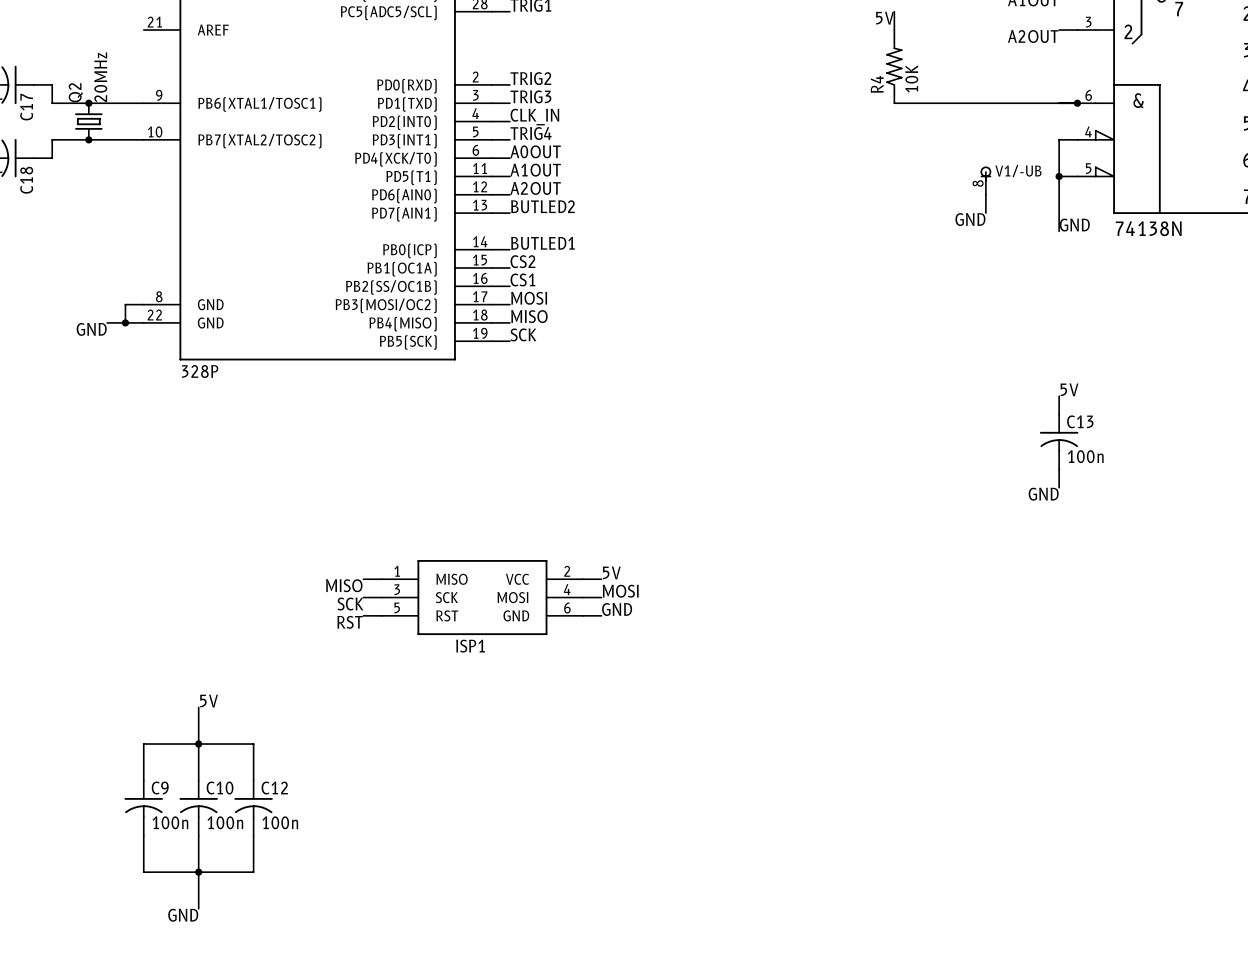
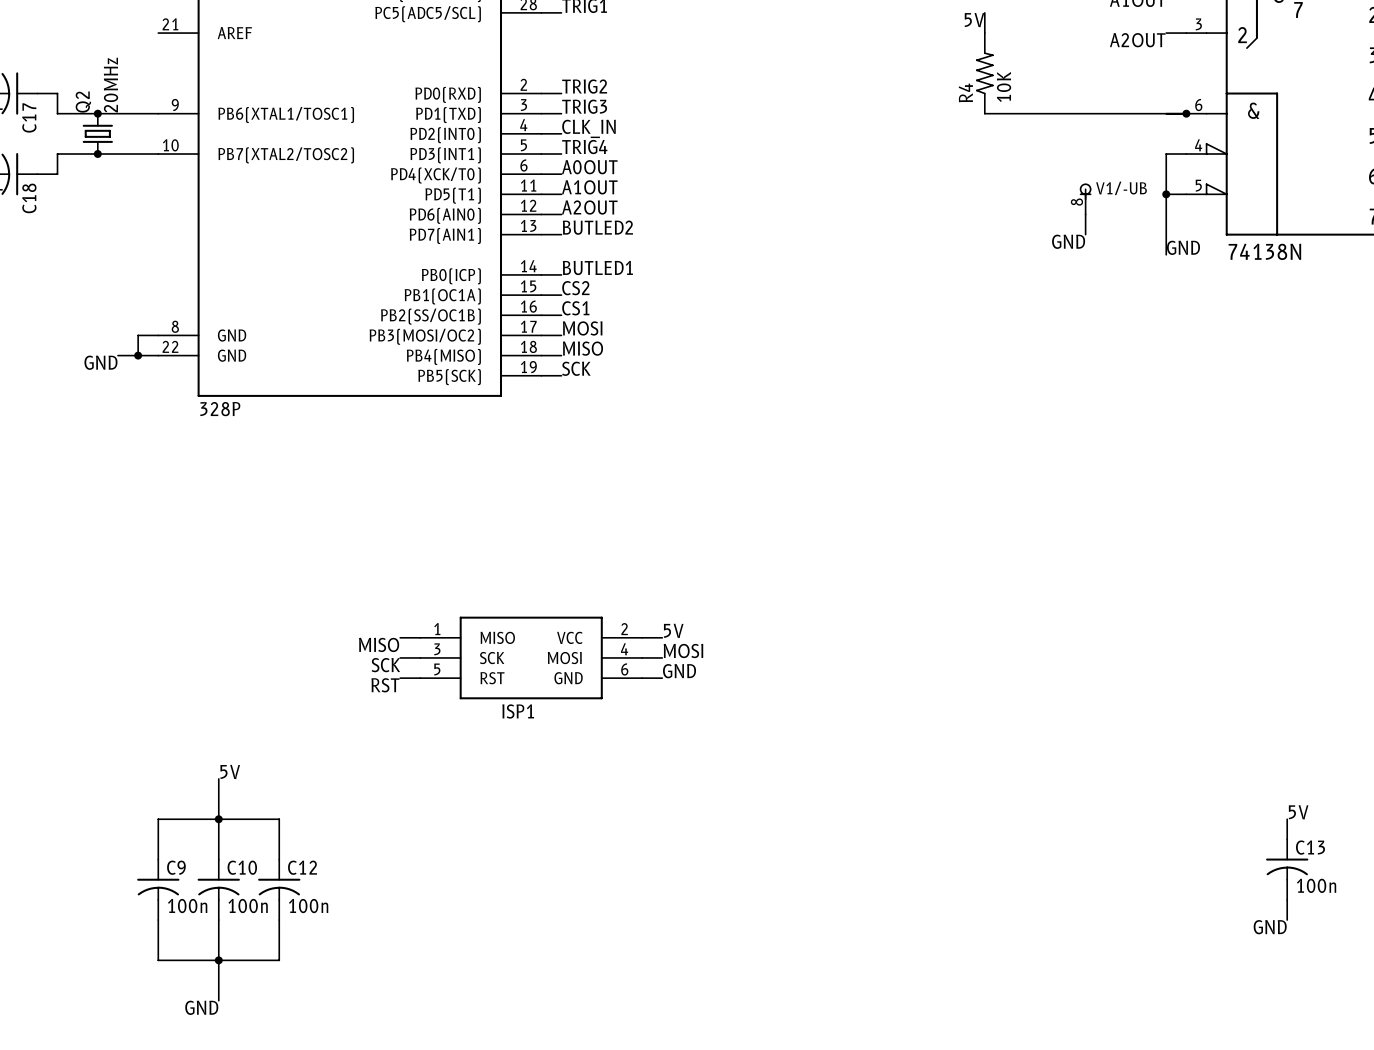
label: 5V (1069, 389) -> none
wire: (1059, 396) (1059, 414) -> none
C13 position: (1059, 441) -> (1287, 869)
wire: (1059, 469) (1059, 487) -> none
label: GND (1043, 494) -> none
label: none -> 5V (1298, 812)
wire: none -> (1287, 819) (1287, 839)
wire: none -> (1287, 899) (1287, 920)
label: none -> GND (1270, 927)

